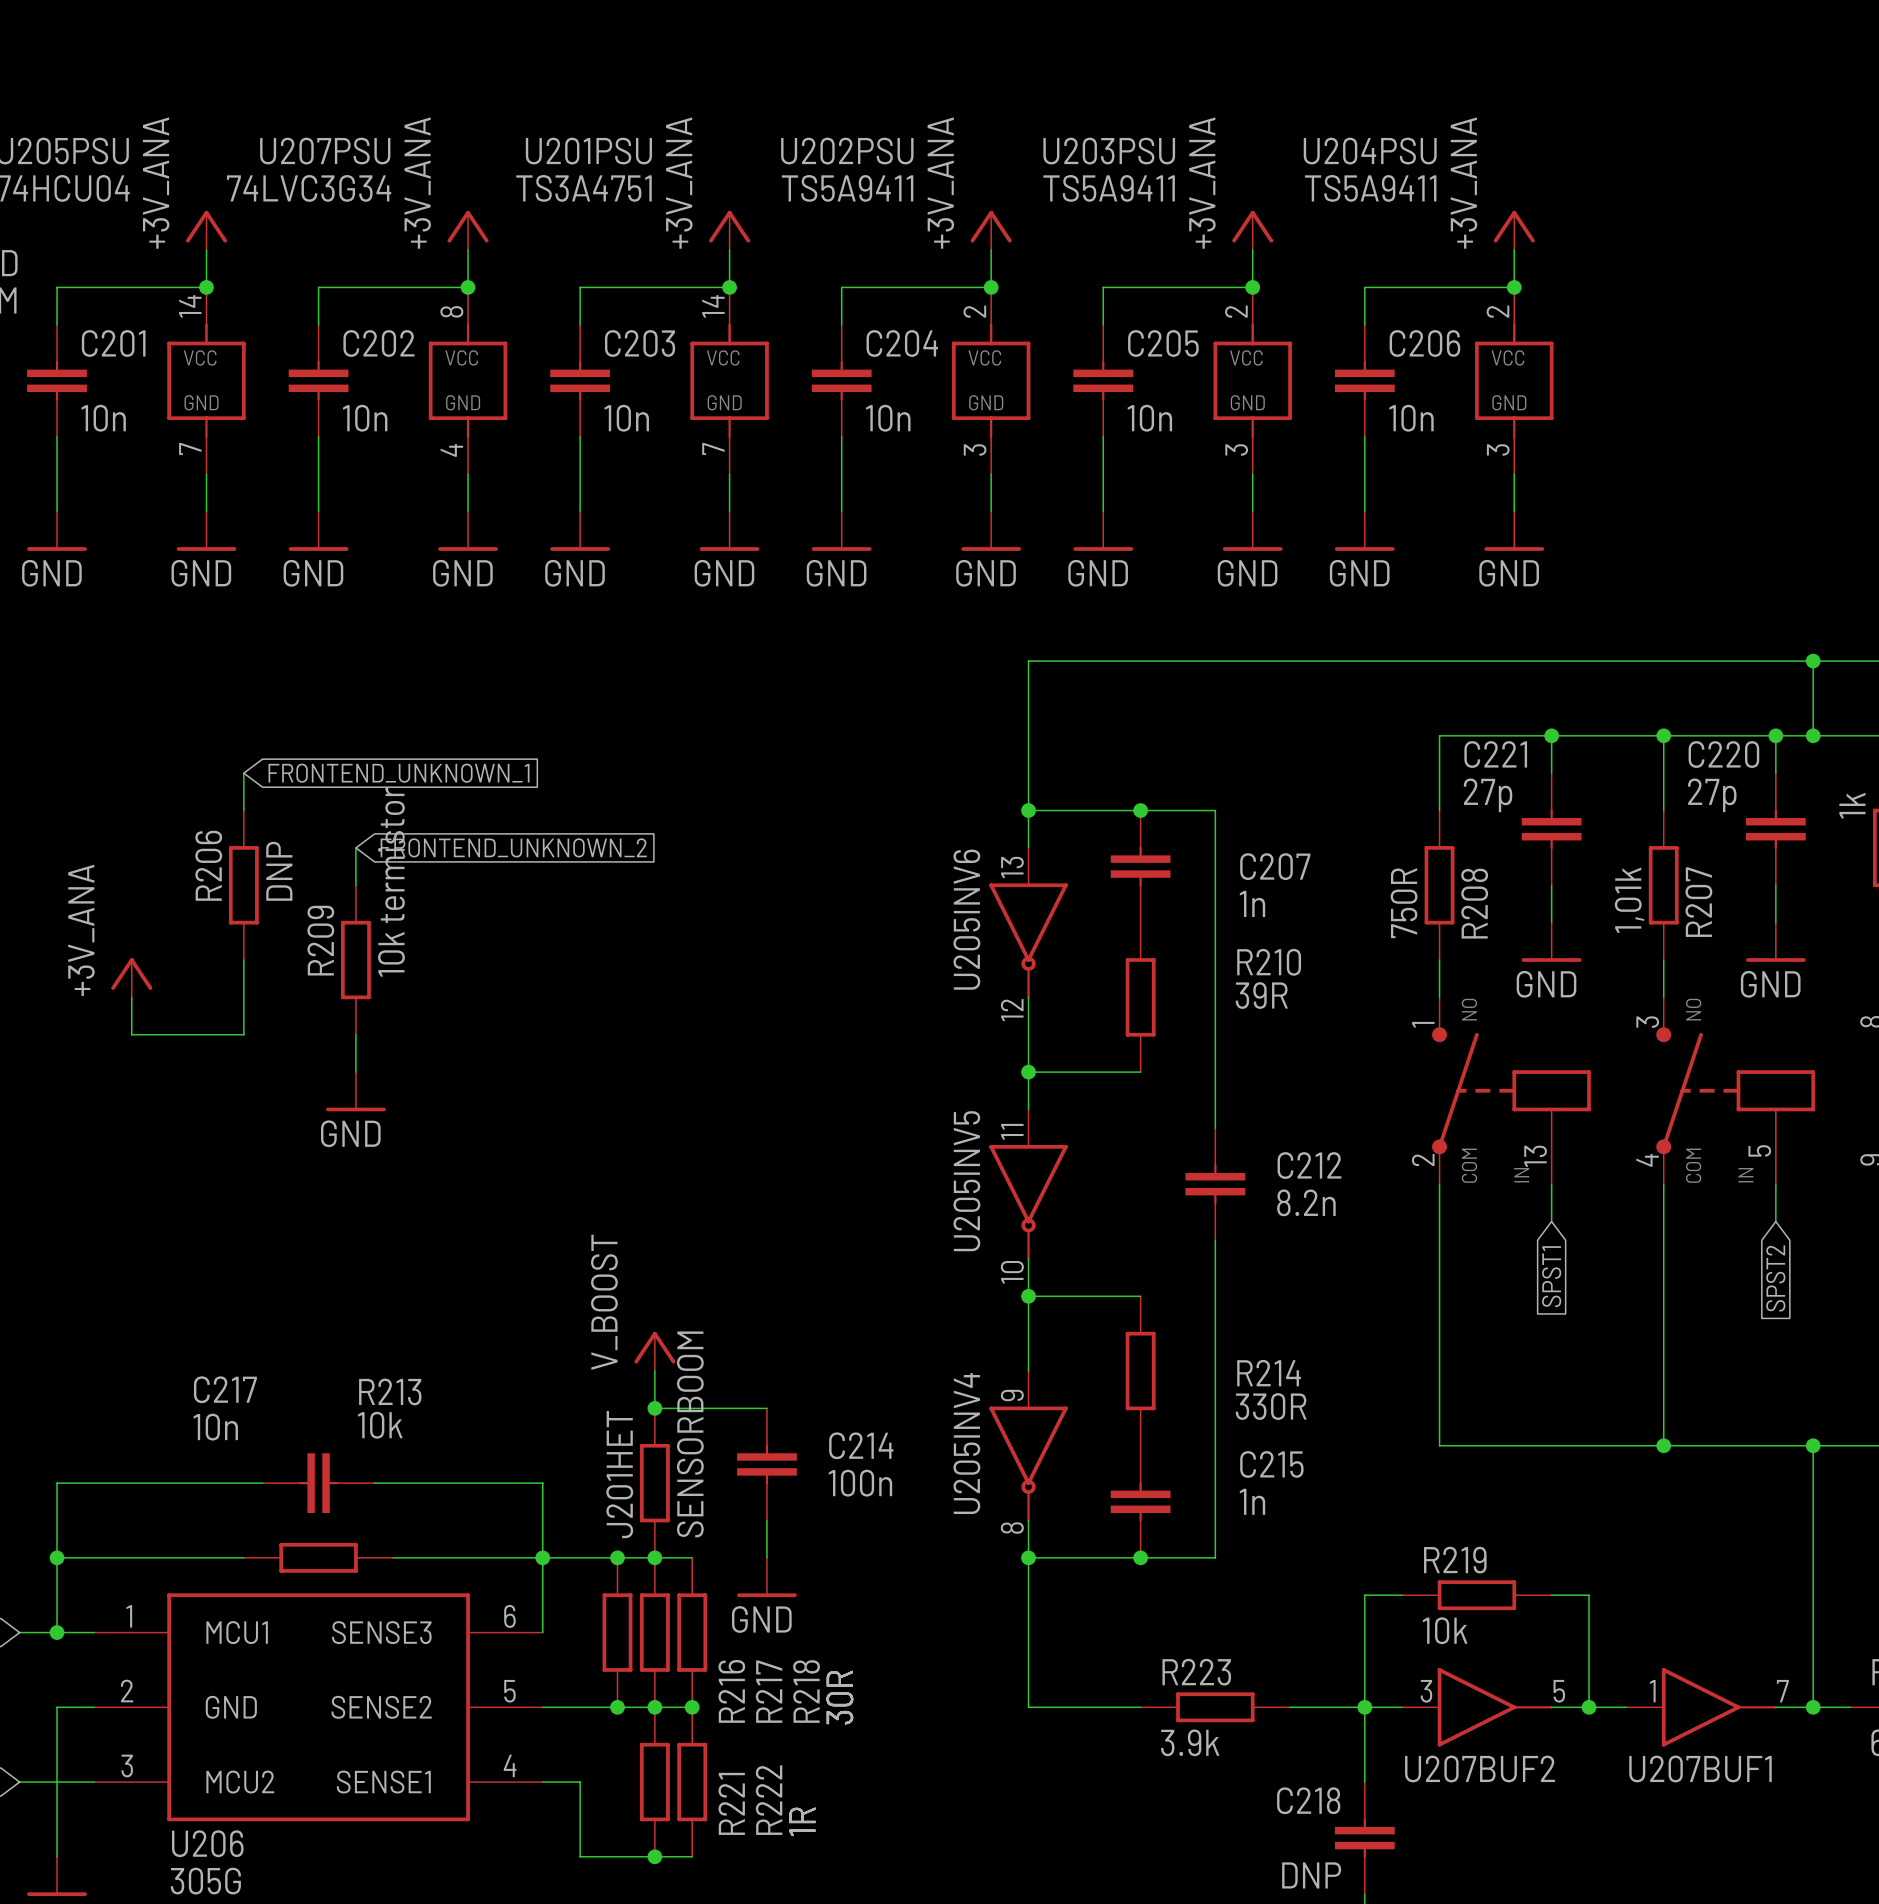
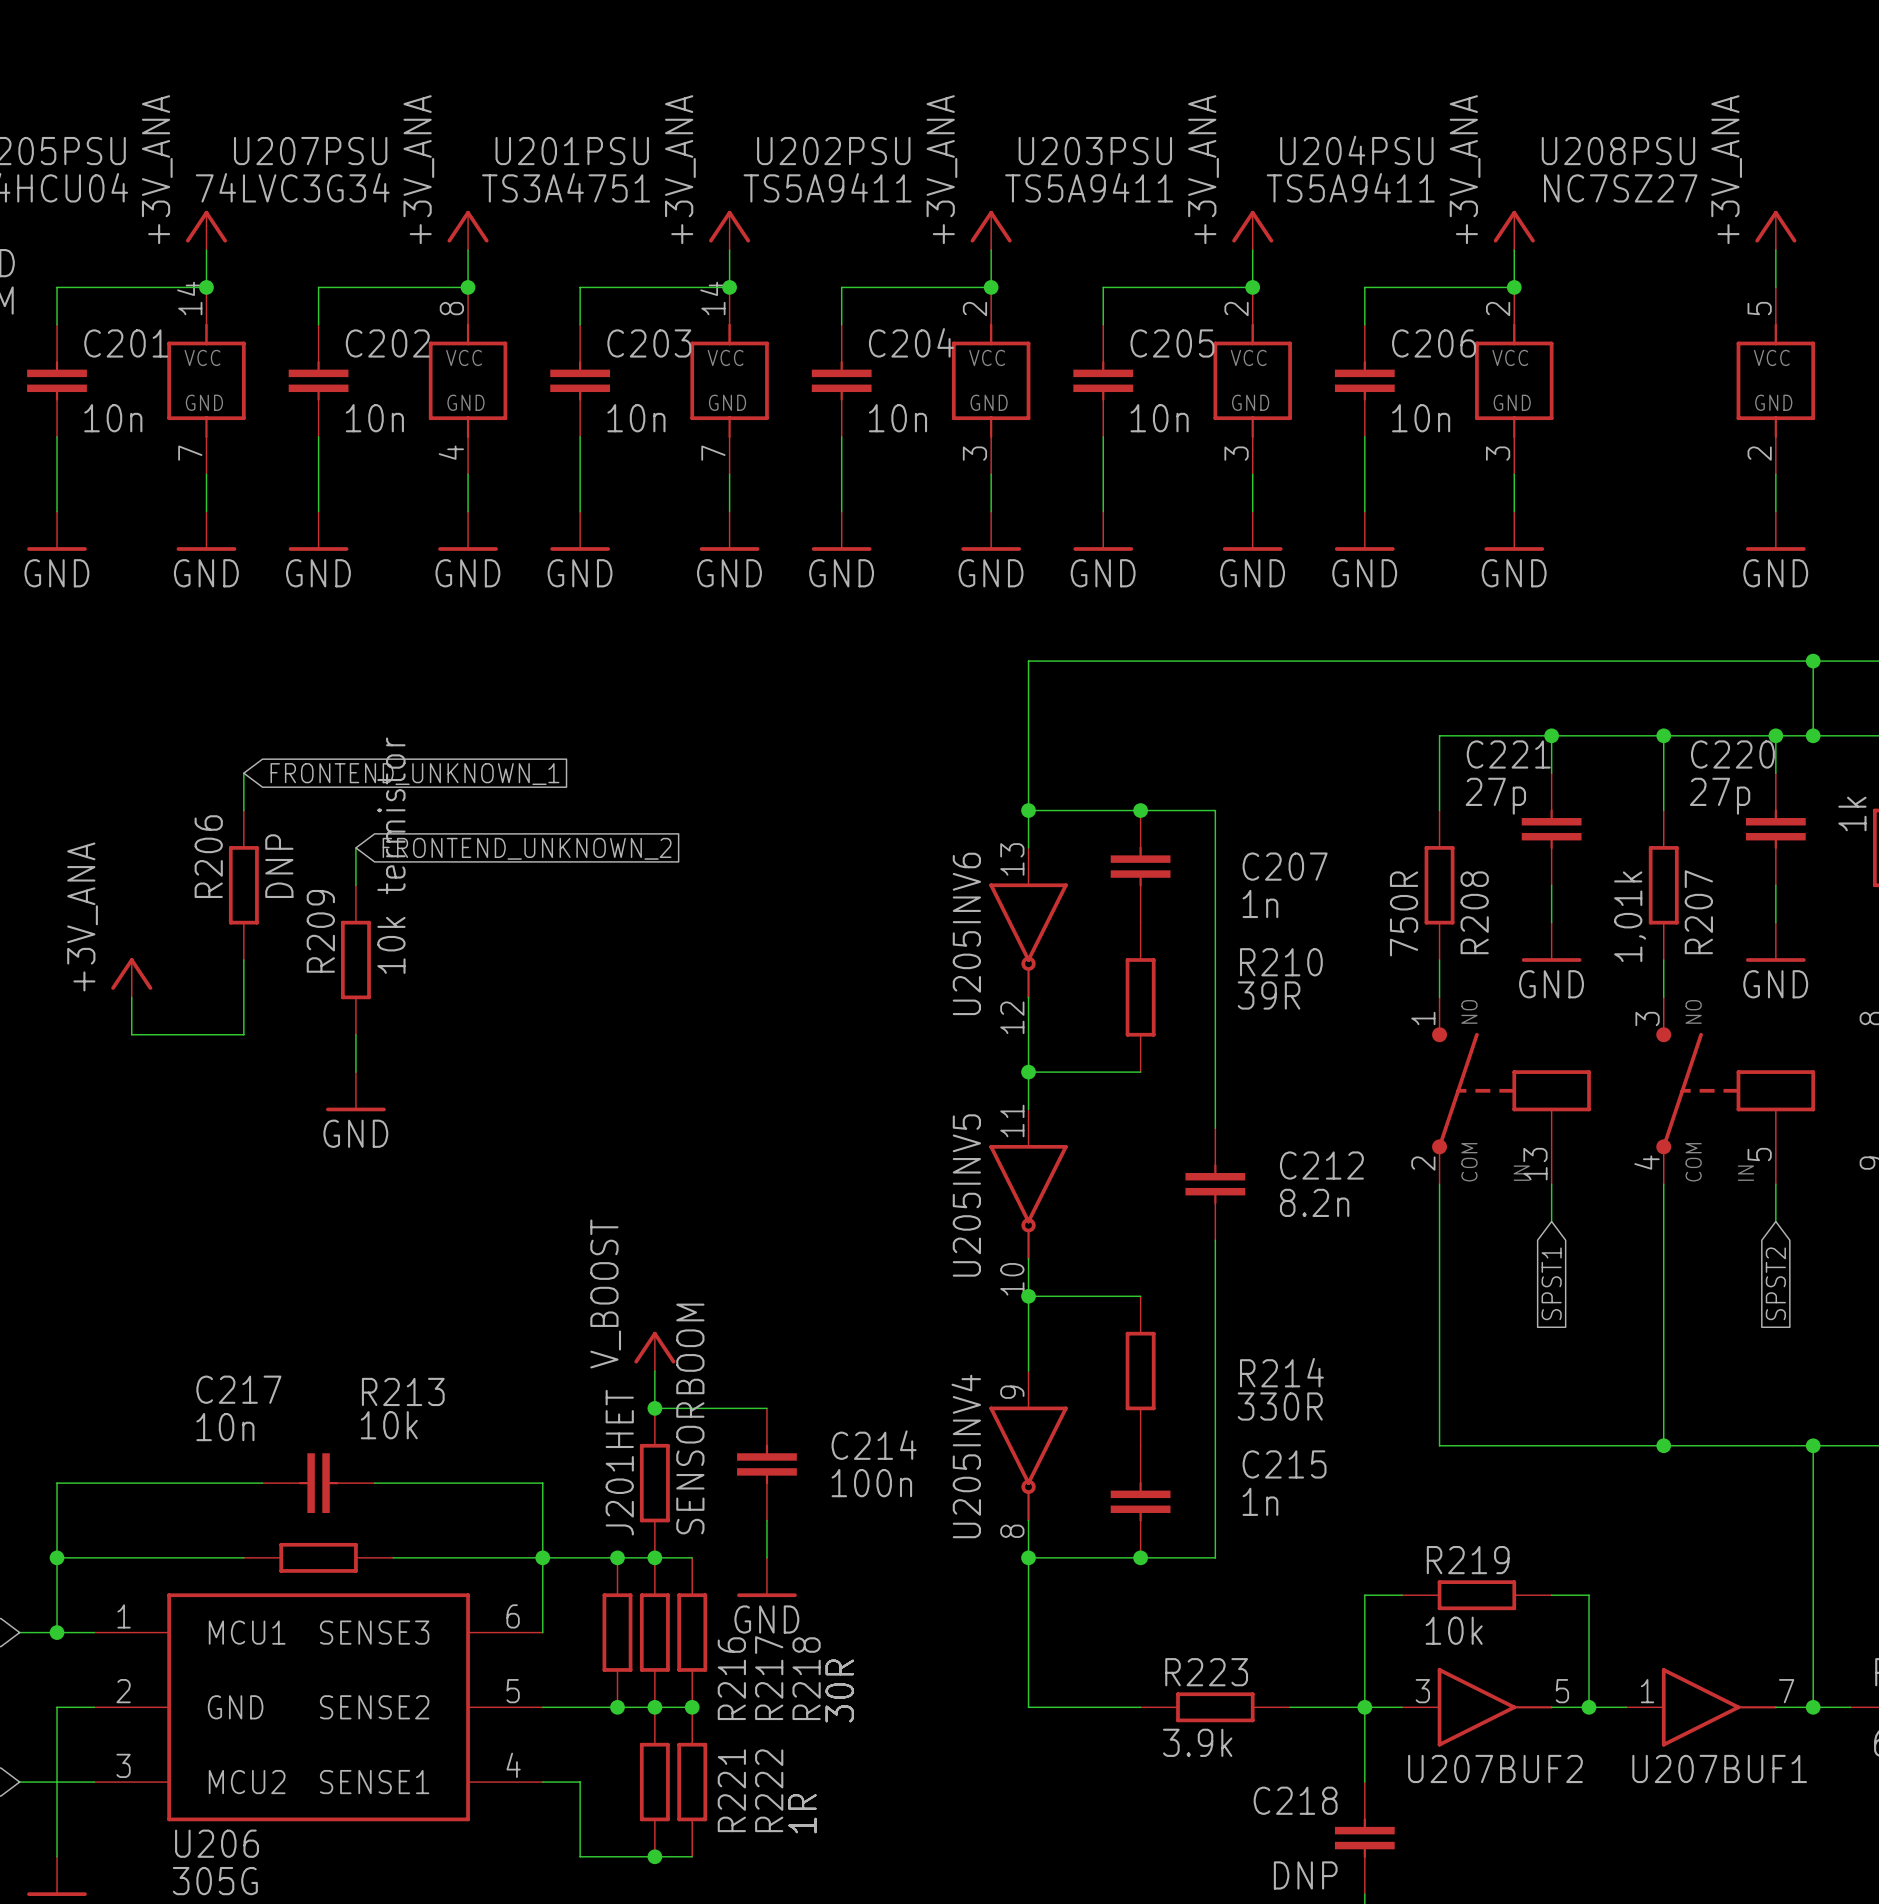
power symbol: none -> +3V_ANA (1775, 230)
wire: none -> (1775, 250) (1775, 287)
U208PSU: none -> NC7SZ27 (1775, 380)
wire: none -> (1775, 474) (1775, 511)
power symbol: none -> GND (1775, 531)

